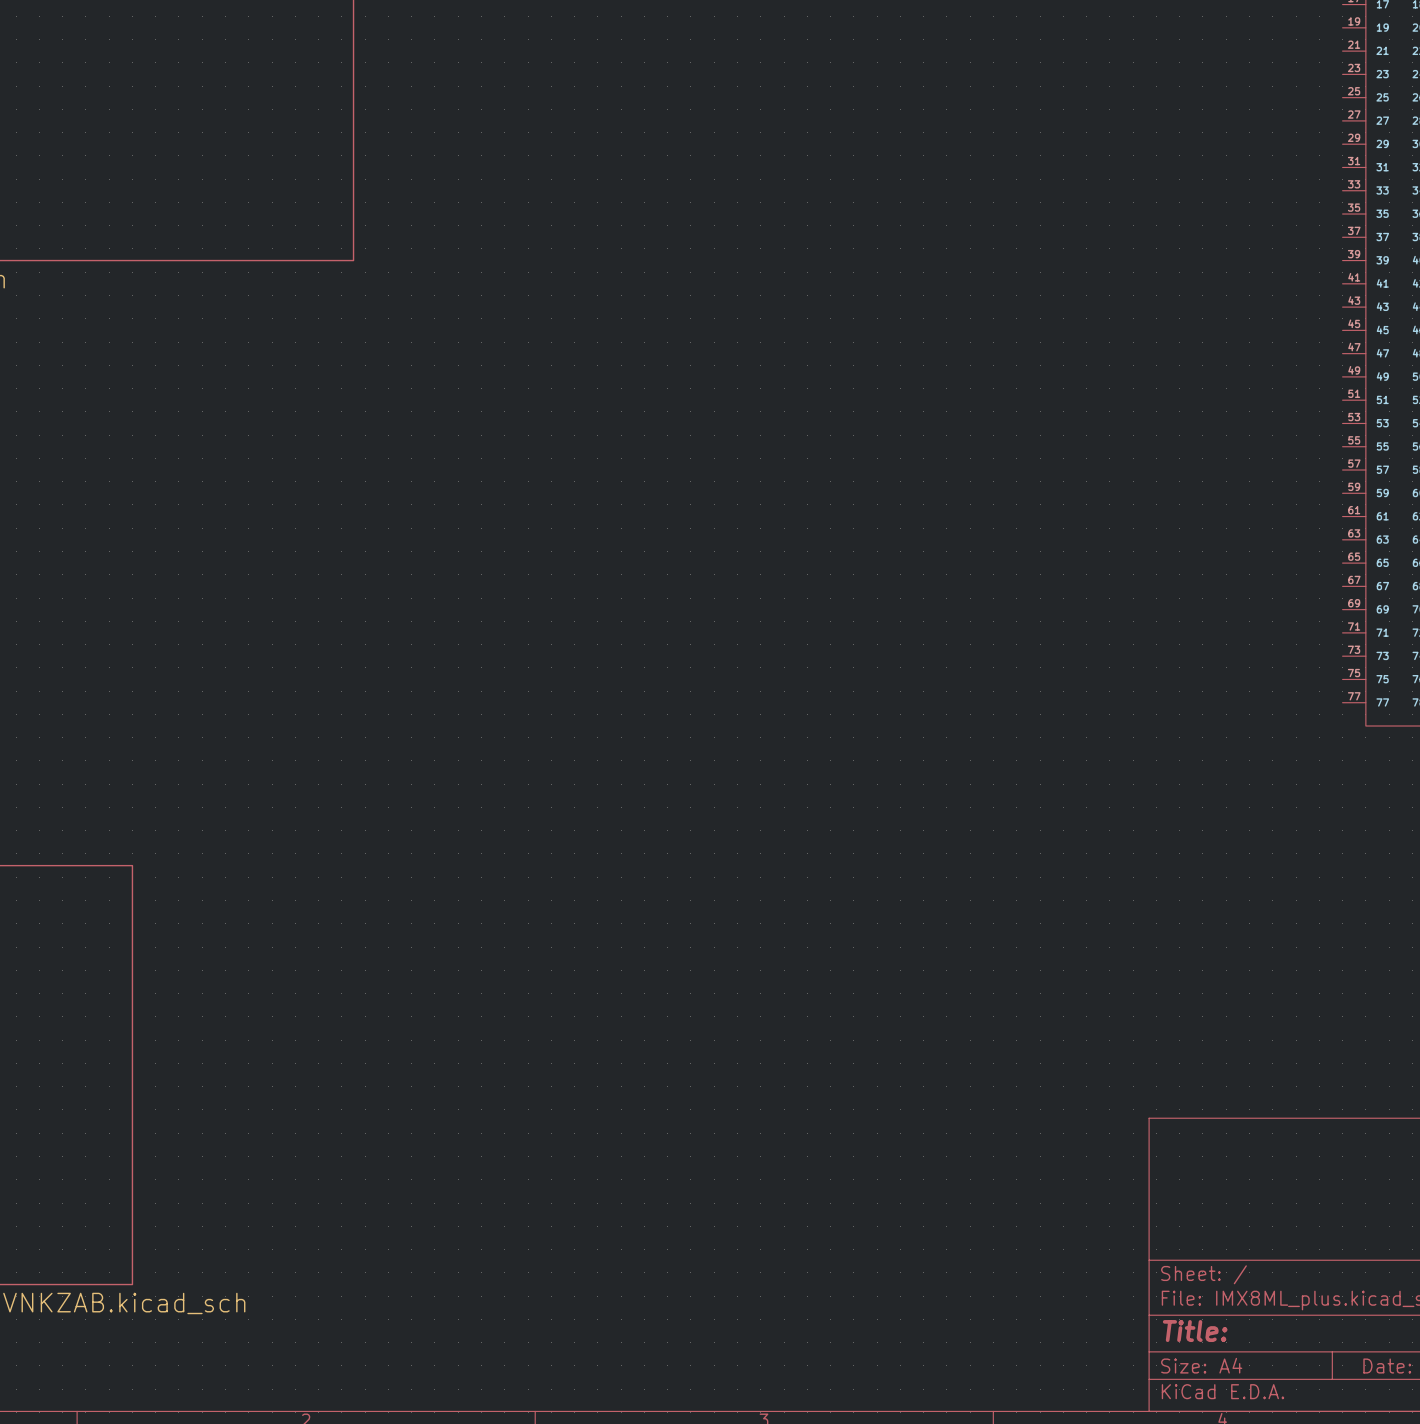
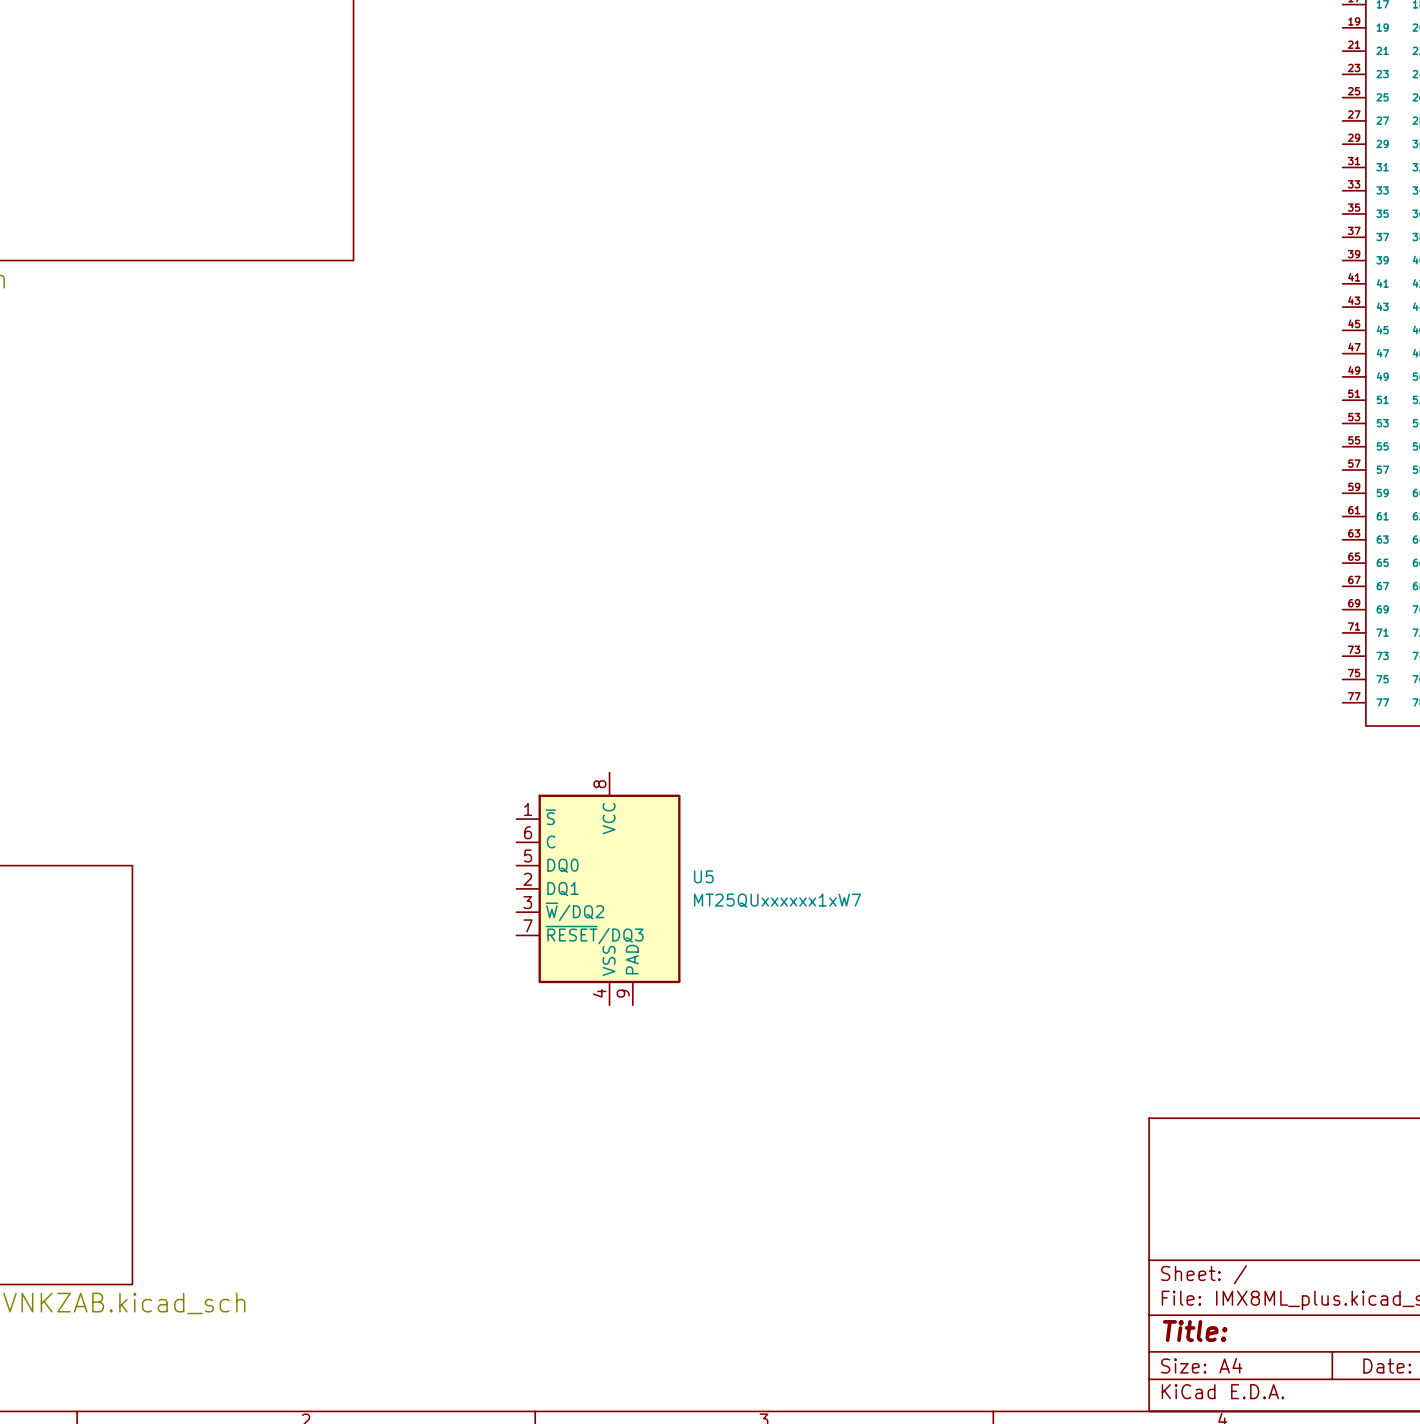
U5: none -> MT25QUxxxxxx1xW7 (598, 888)

